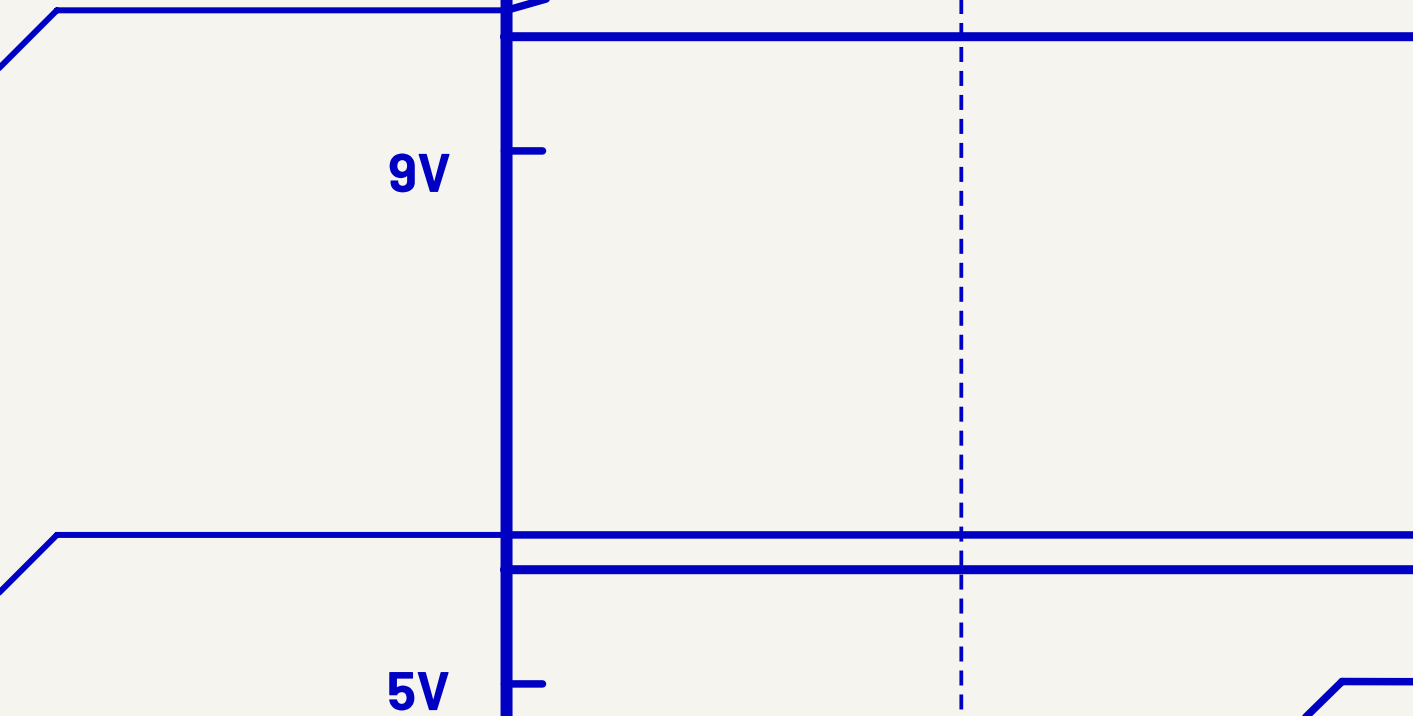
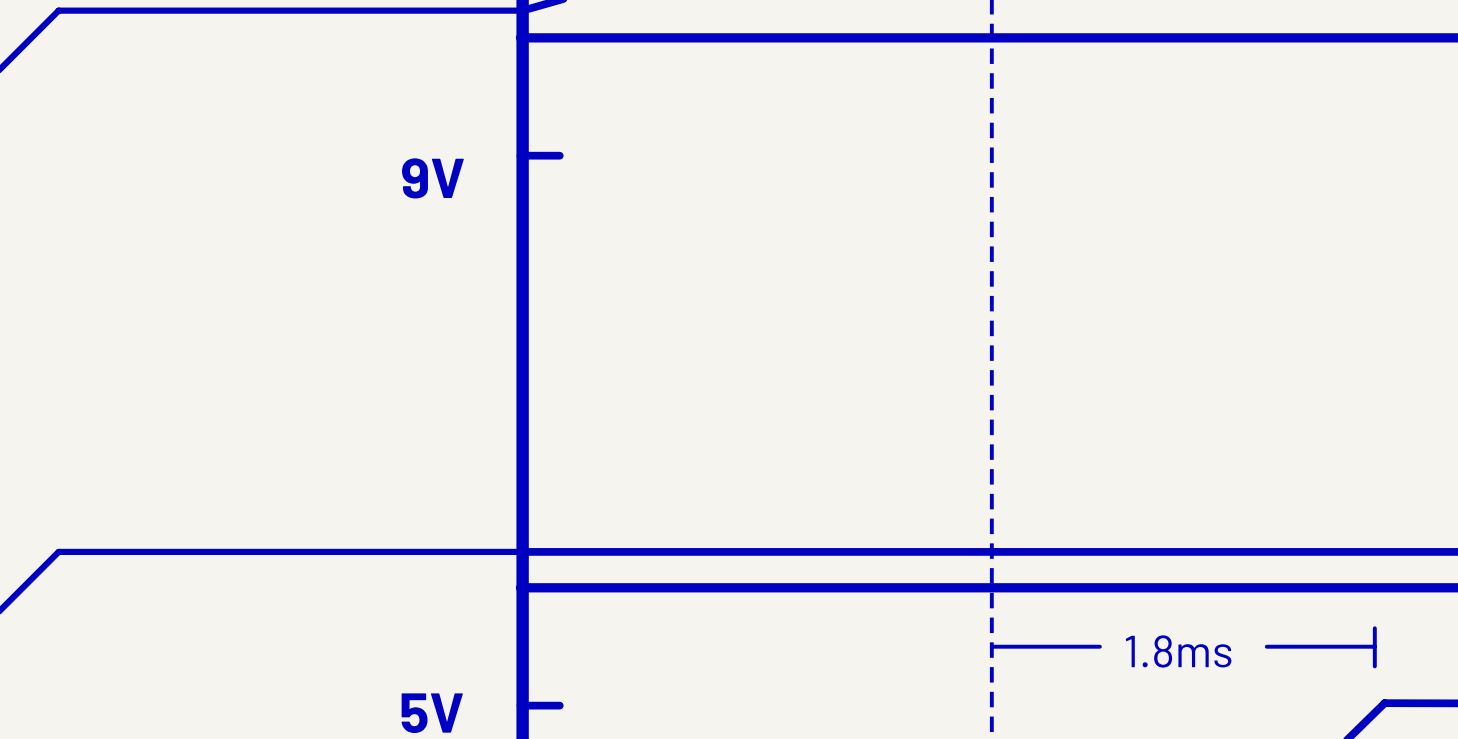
line: none -> (1374, 628) (1374, 666)
line: none -> (991, 646) (1099, 646)
line: none -> (1266, 646) (1374, 646)
text: none -> 1.8ms (1178, 651)

